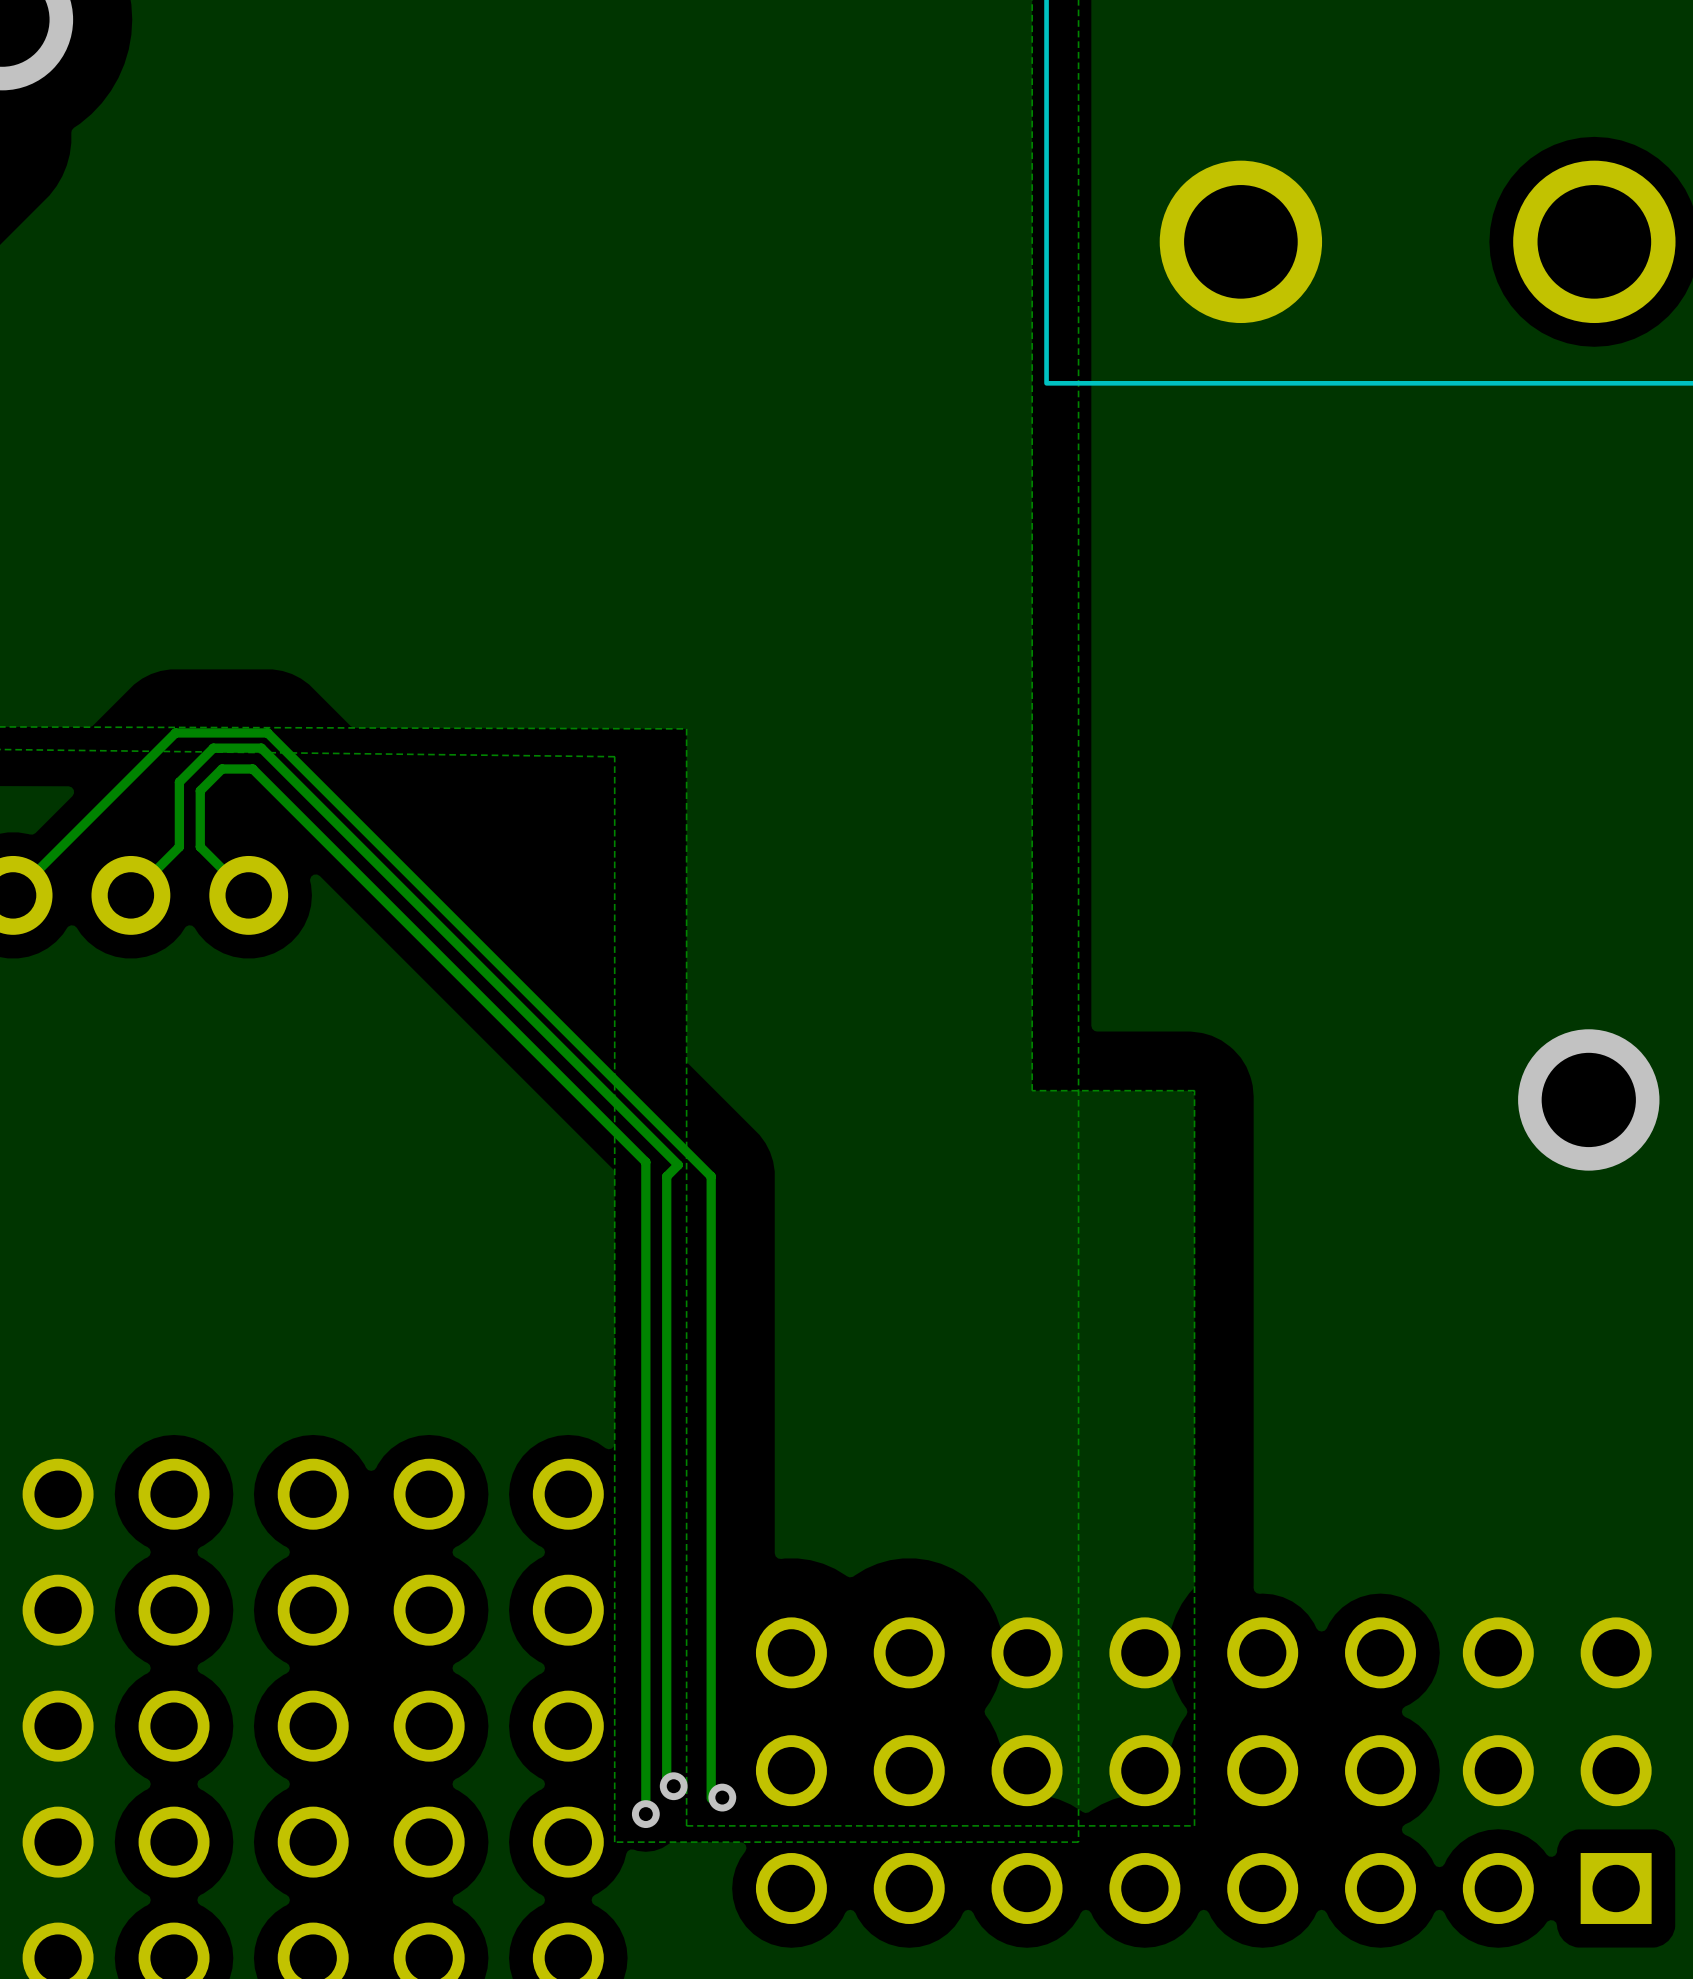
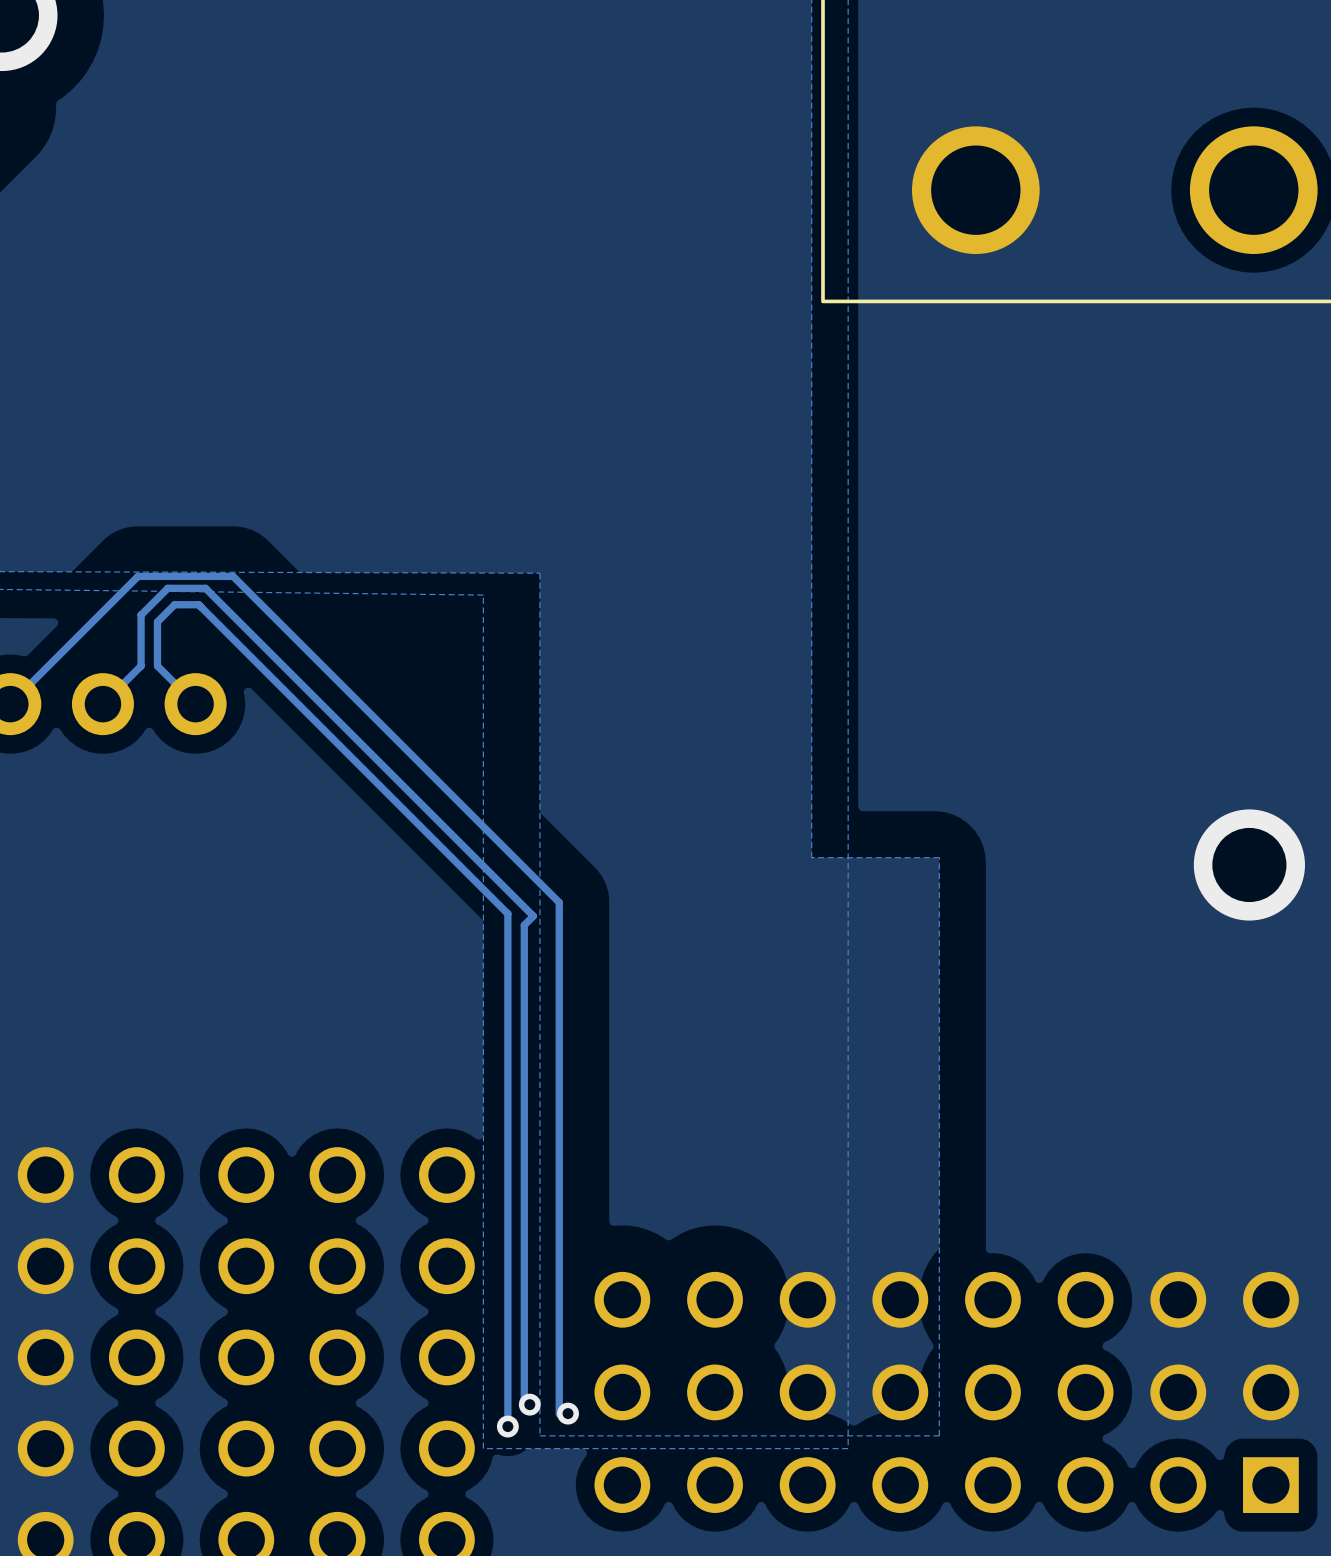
track: (267, 732) (711, 1176) -> (210, 576) (233, 576) (559, 902) (559, 925)

